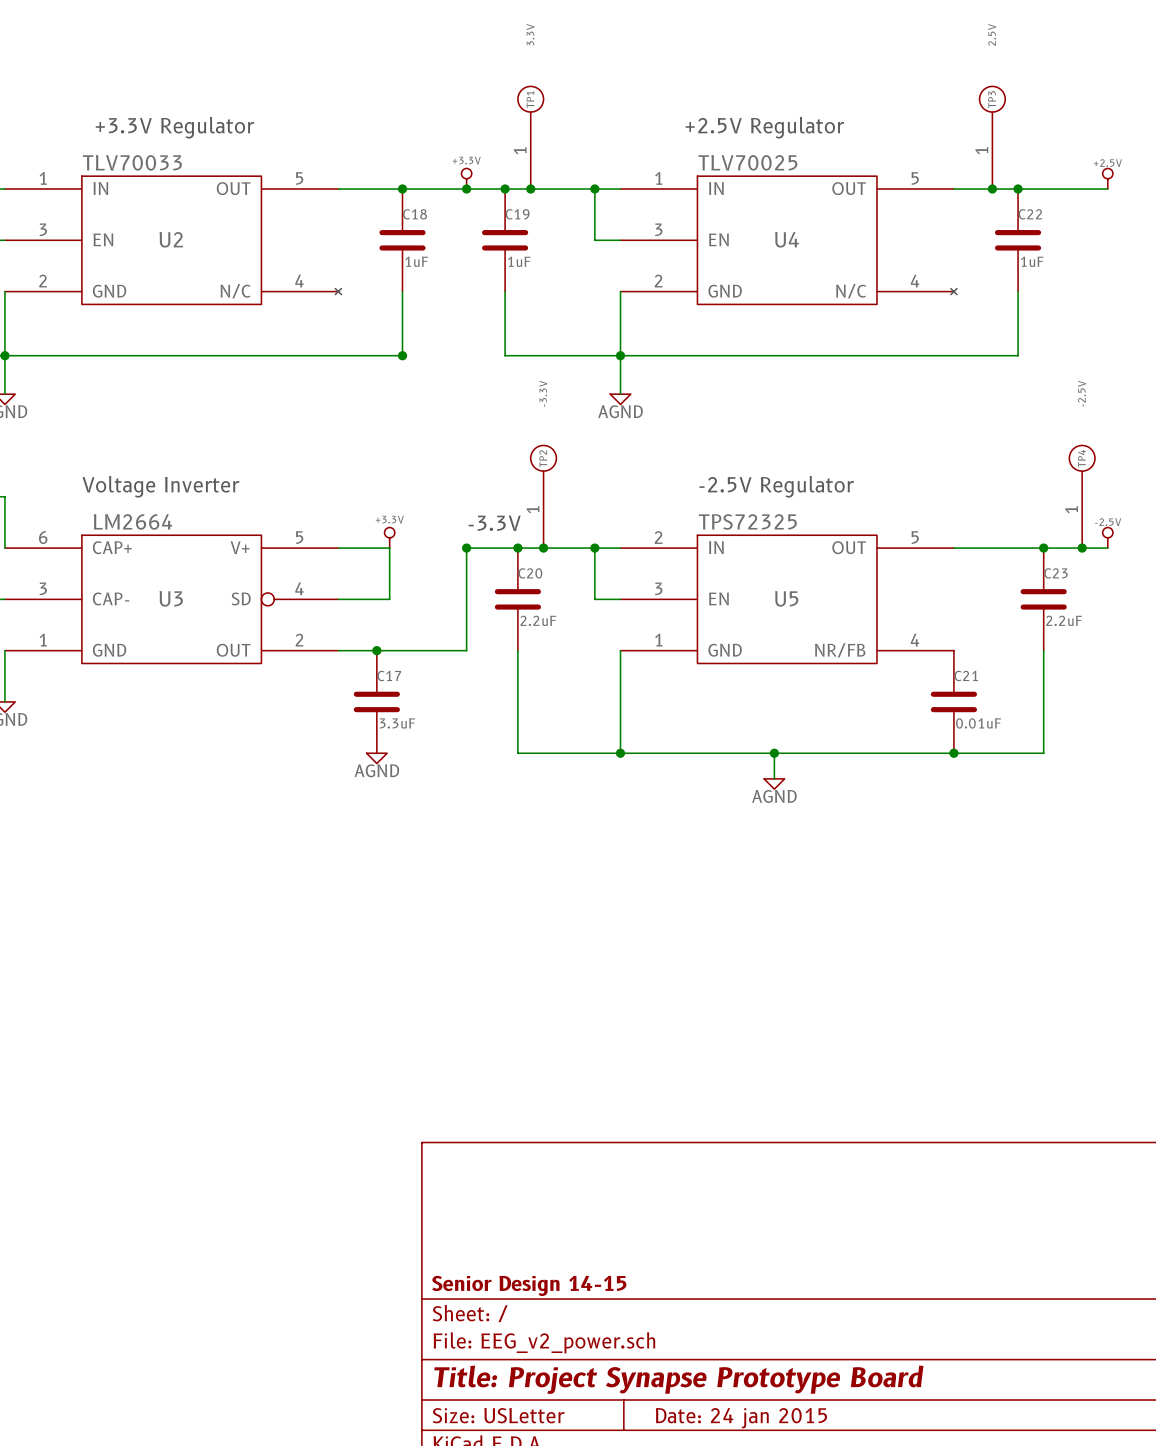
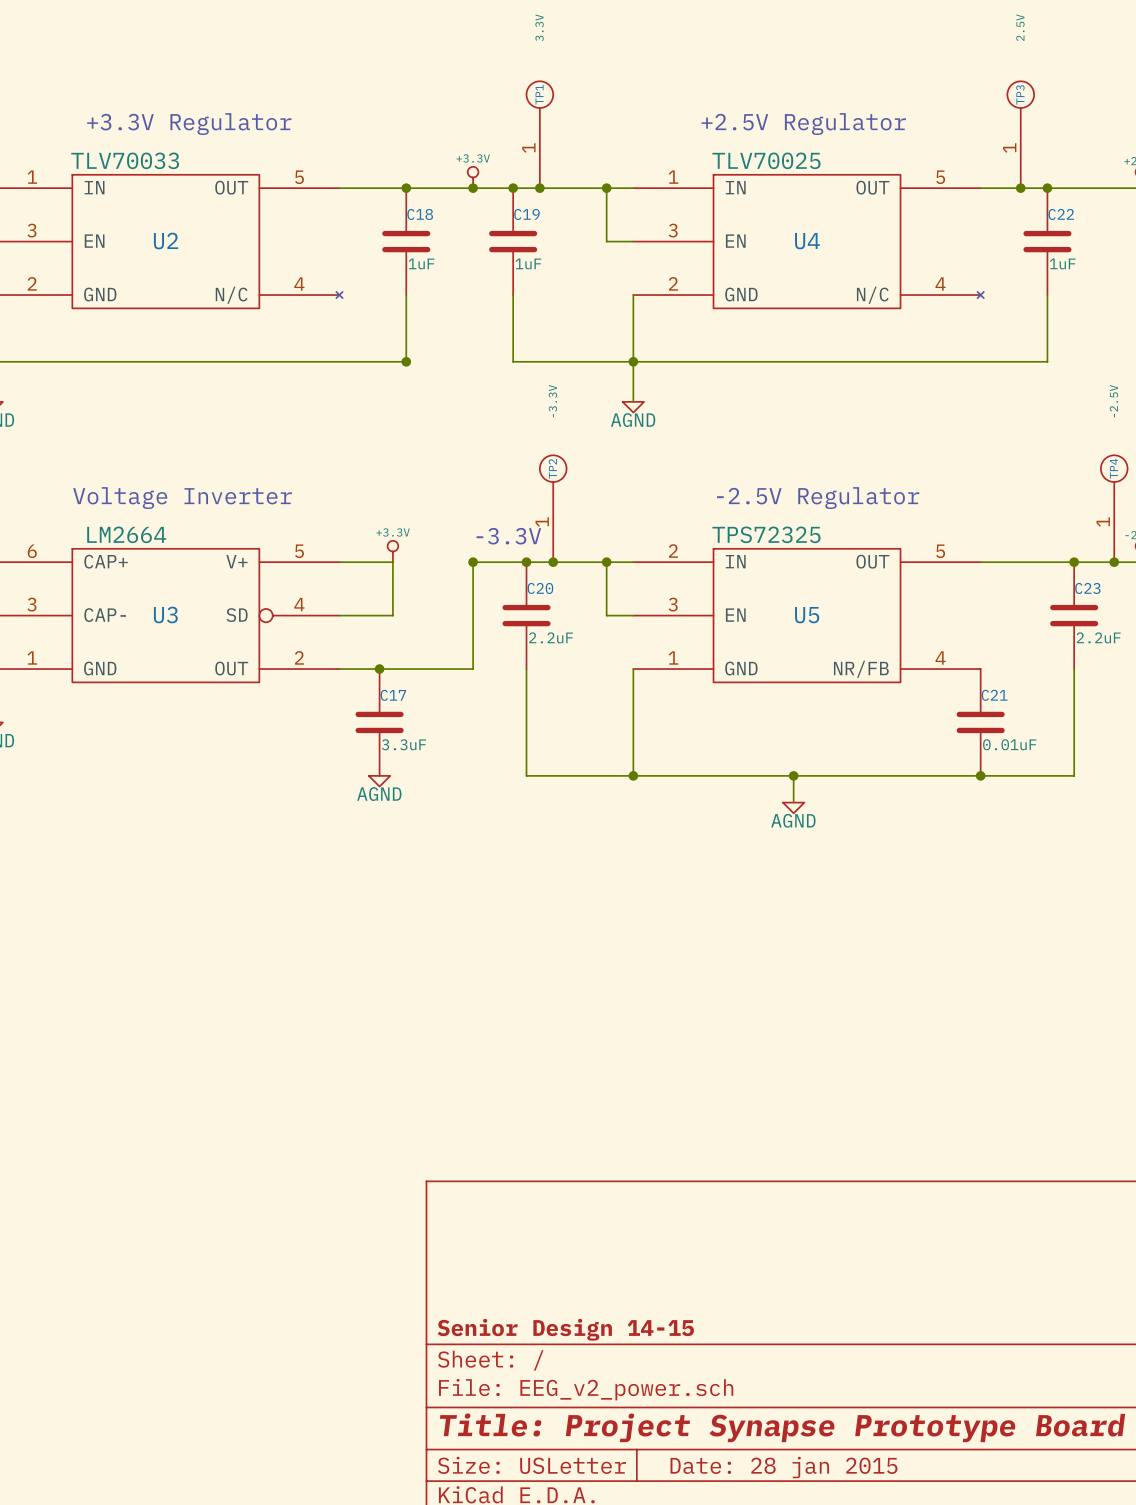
title block: Date: 24 jan 2015 (741, 1418) -> Date: 28 jan 2015 (783, 1467)

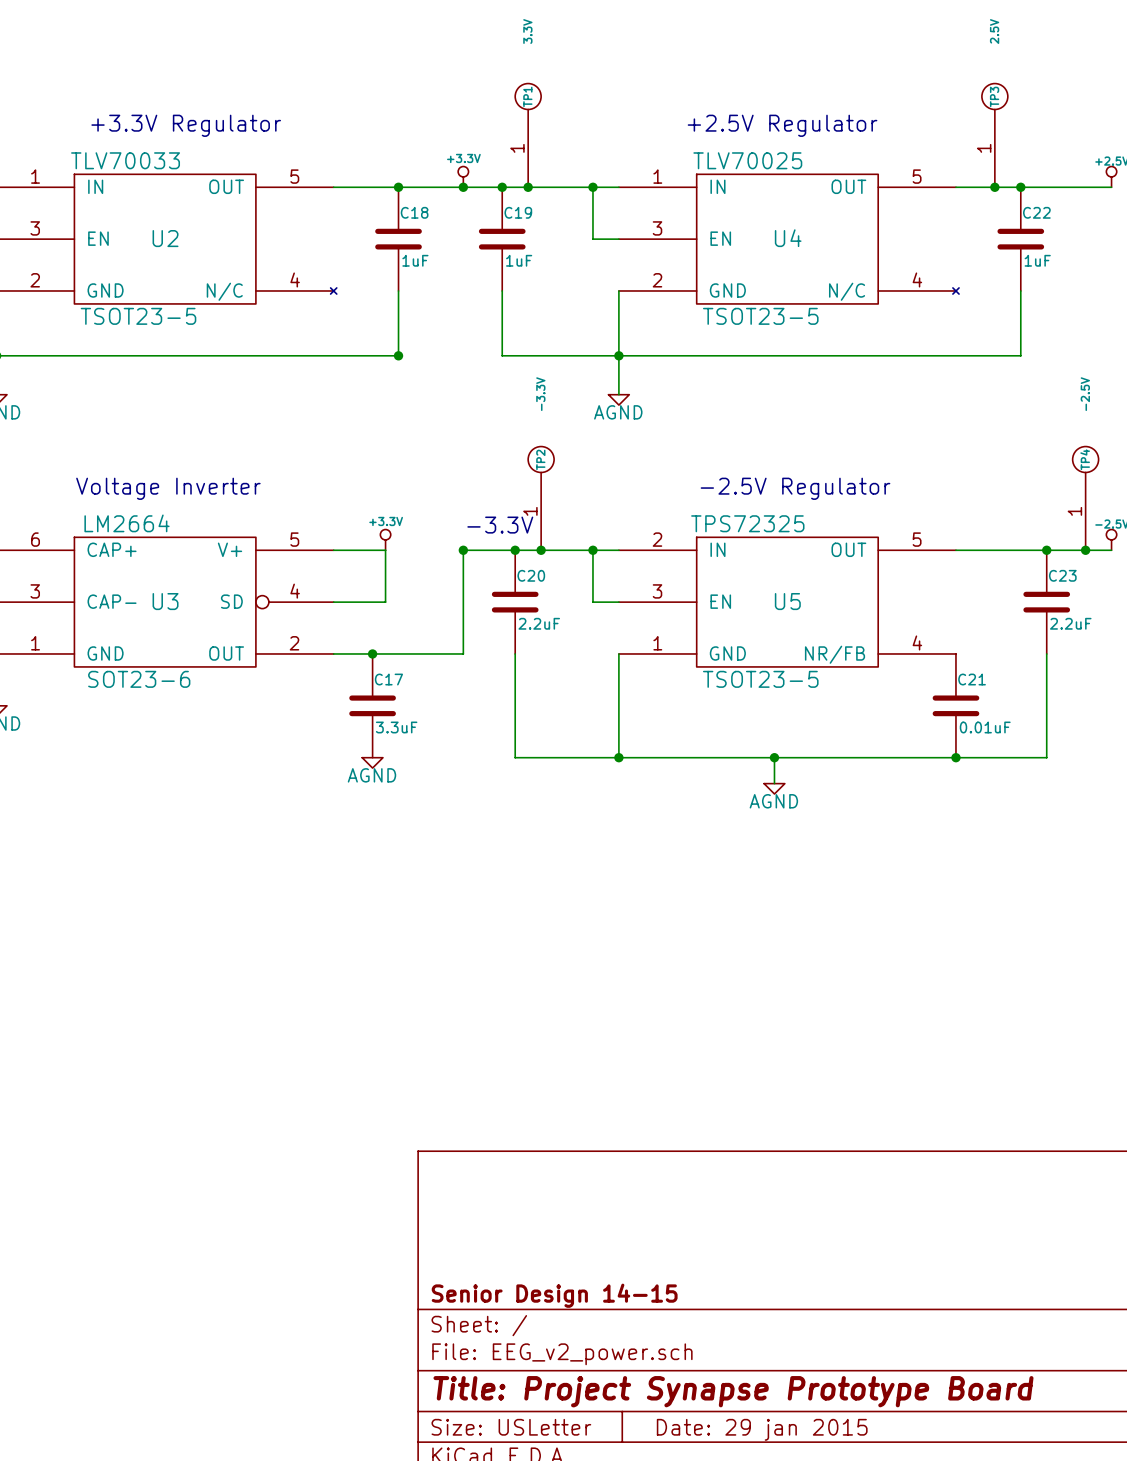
U2 text: none -> TSOT23-5 (138, 316)
U4 text: none -> TSOT23-5 (760, 316)
U3 text: none -> SOT23-6 (139, 679)
U5 text: none -> TSOT23-5 (760, 679)
title block: Date: 28 jan 2015 (783, 1467) -> Date: 29 jan 2015 (762, 1429)

